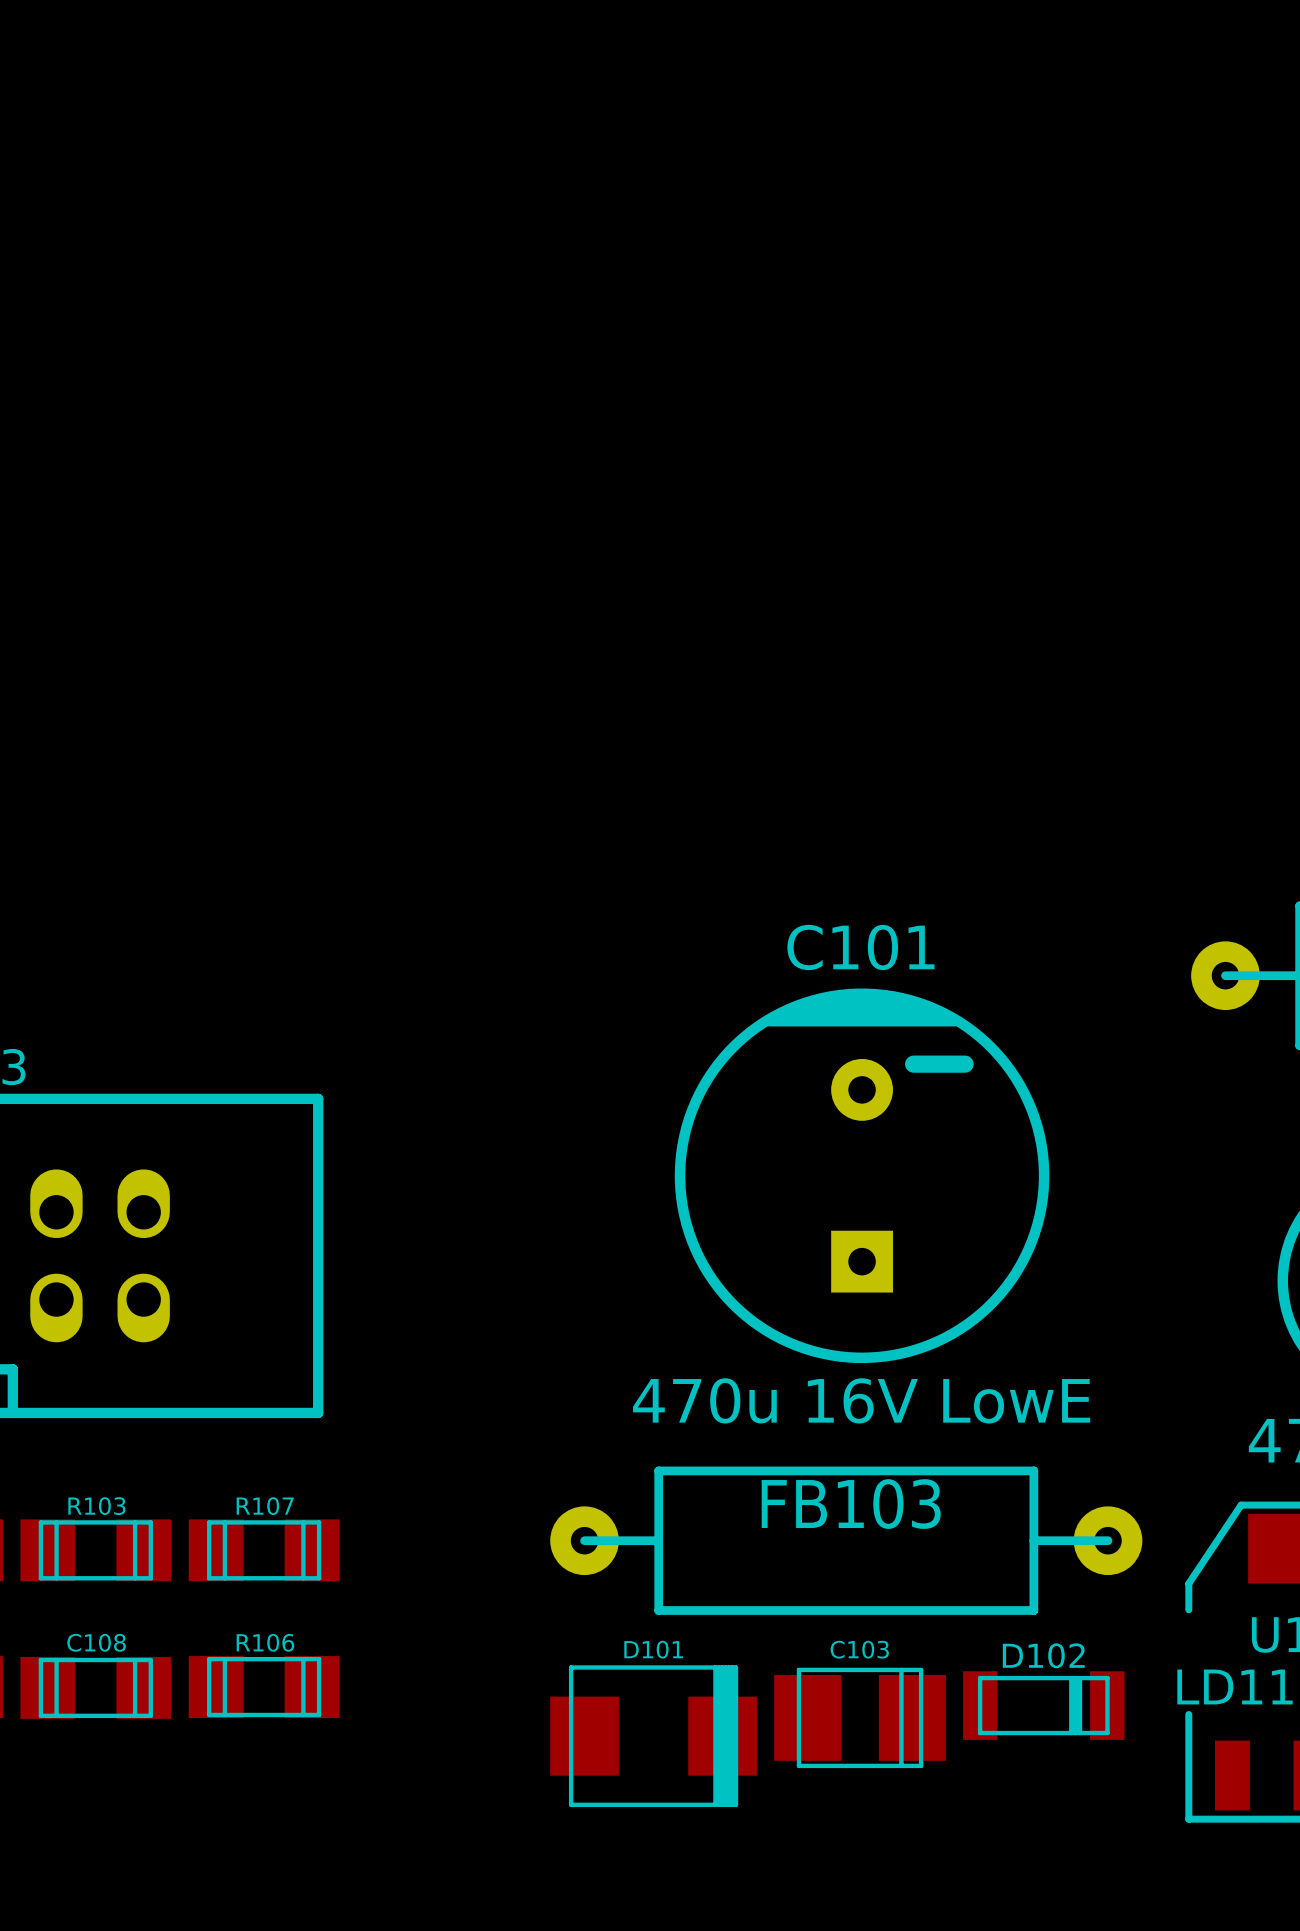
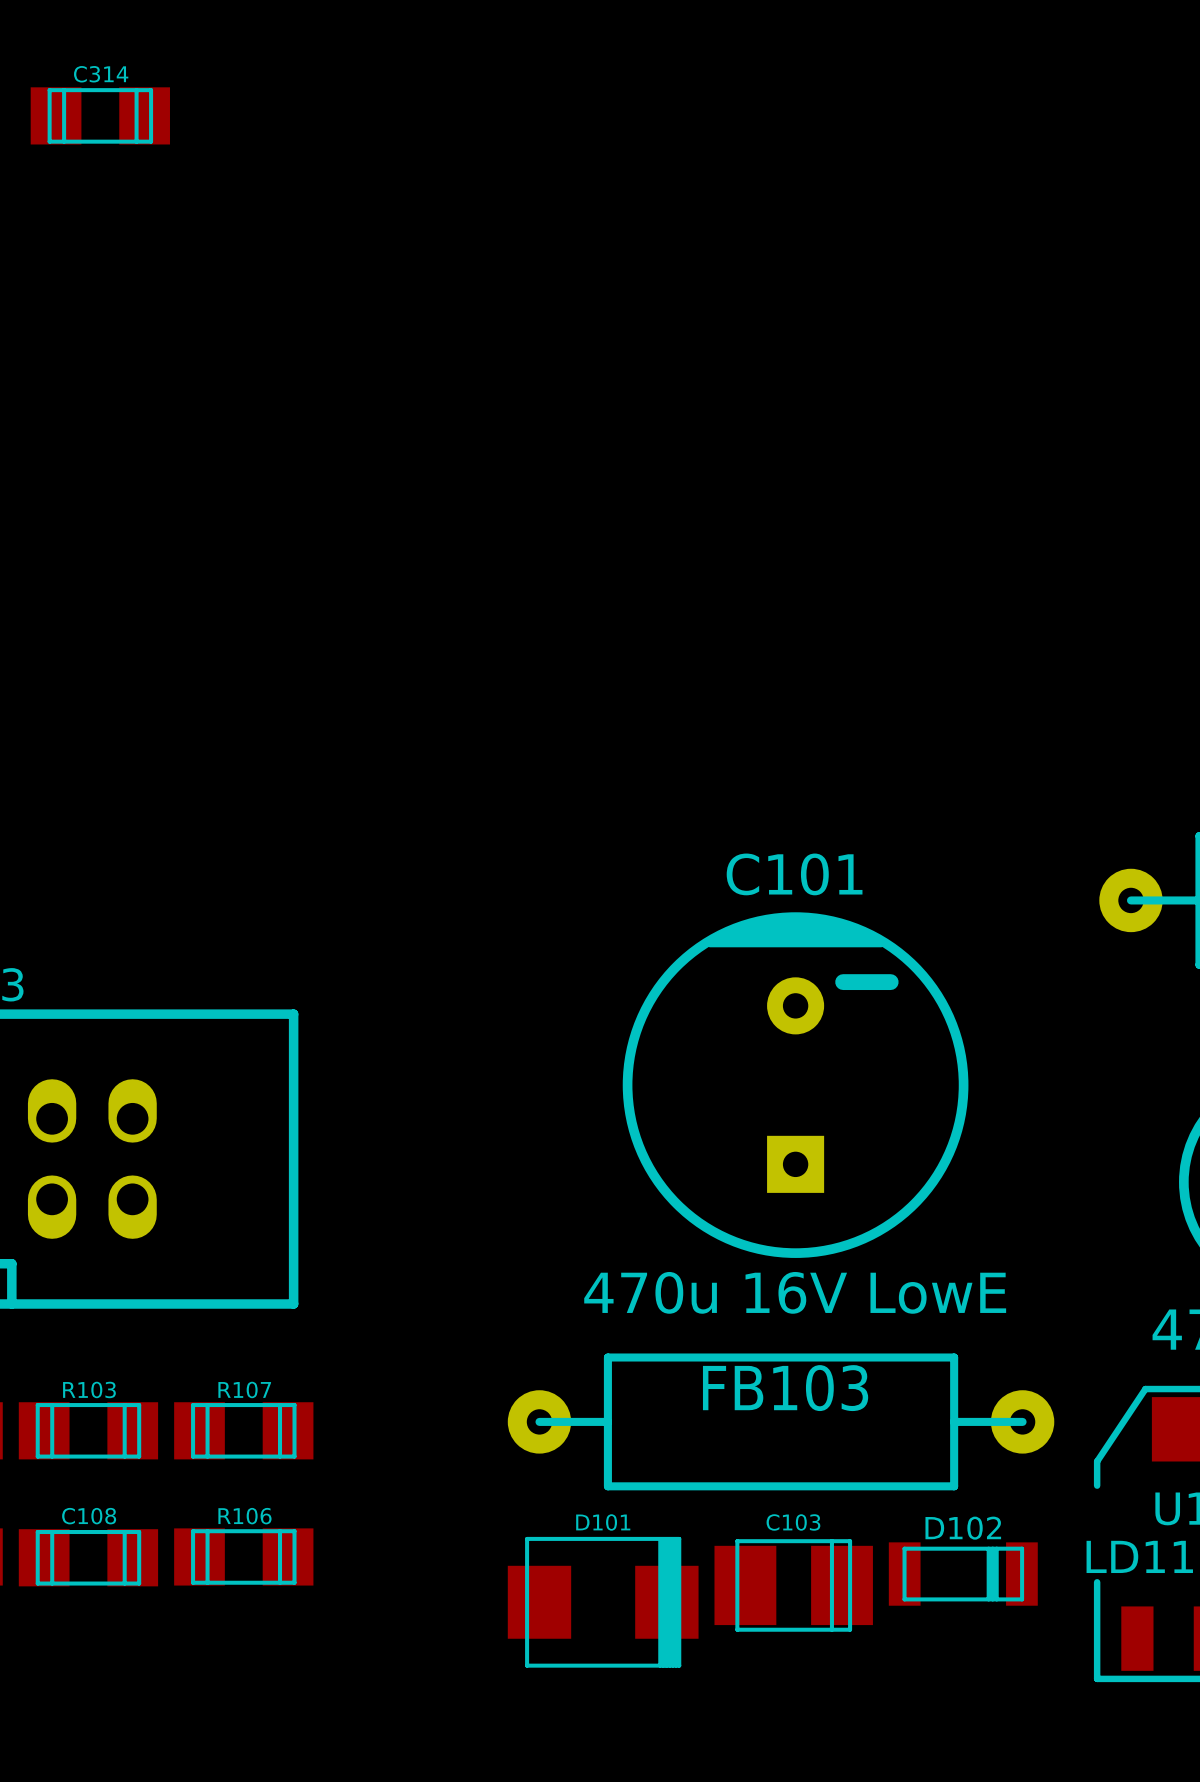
C314: none -> (100, 115)

